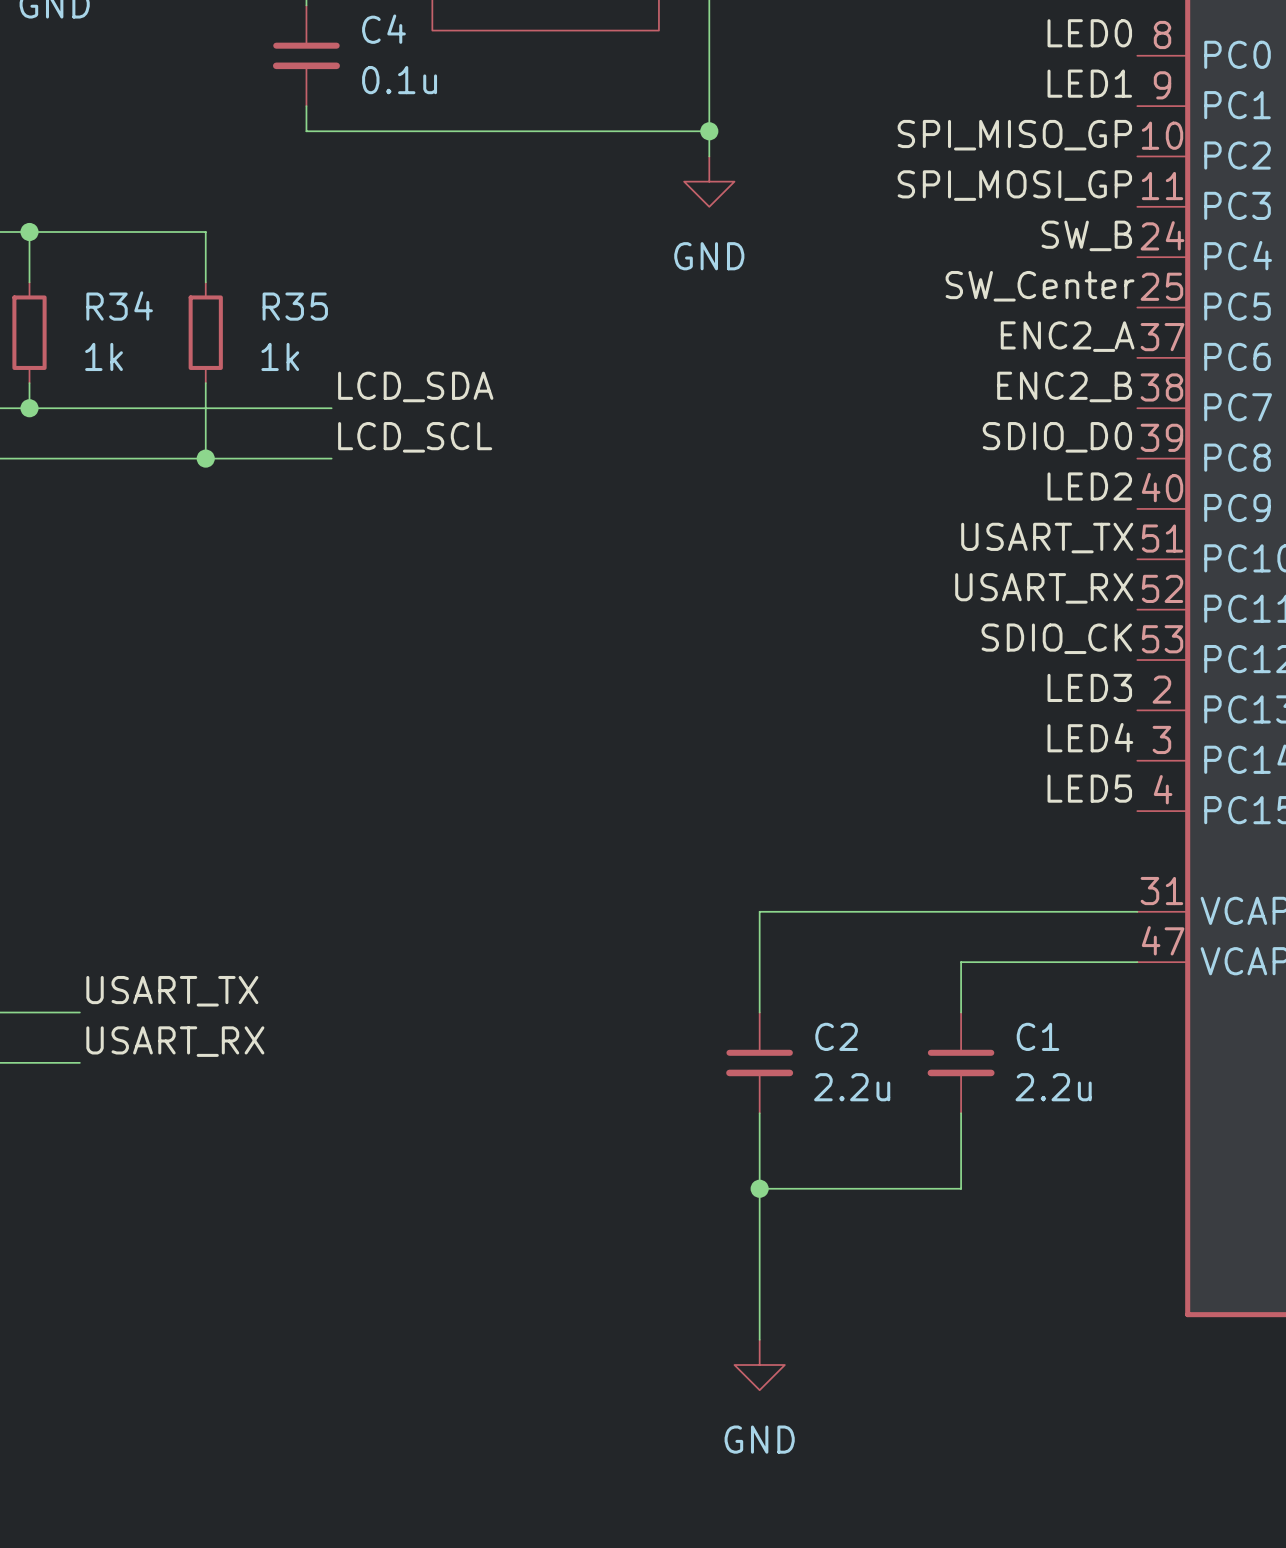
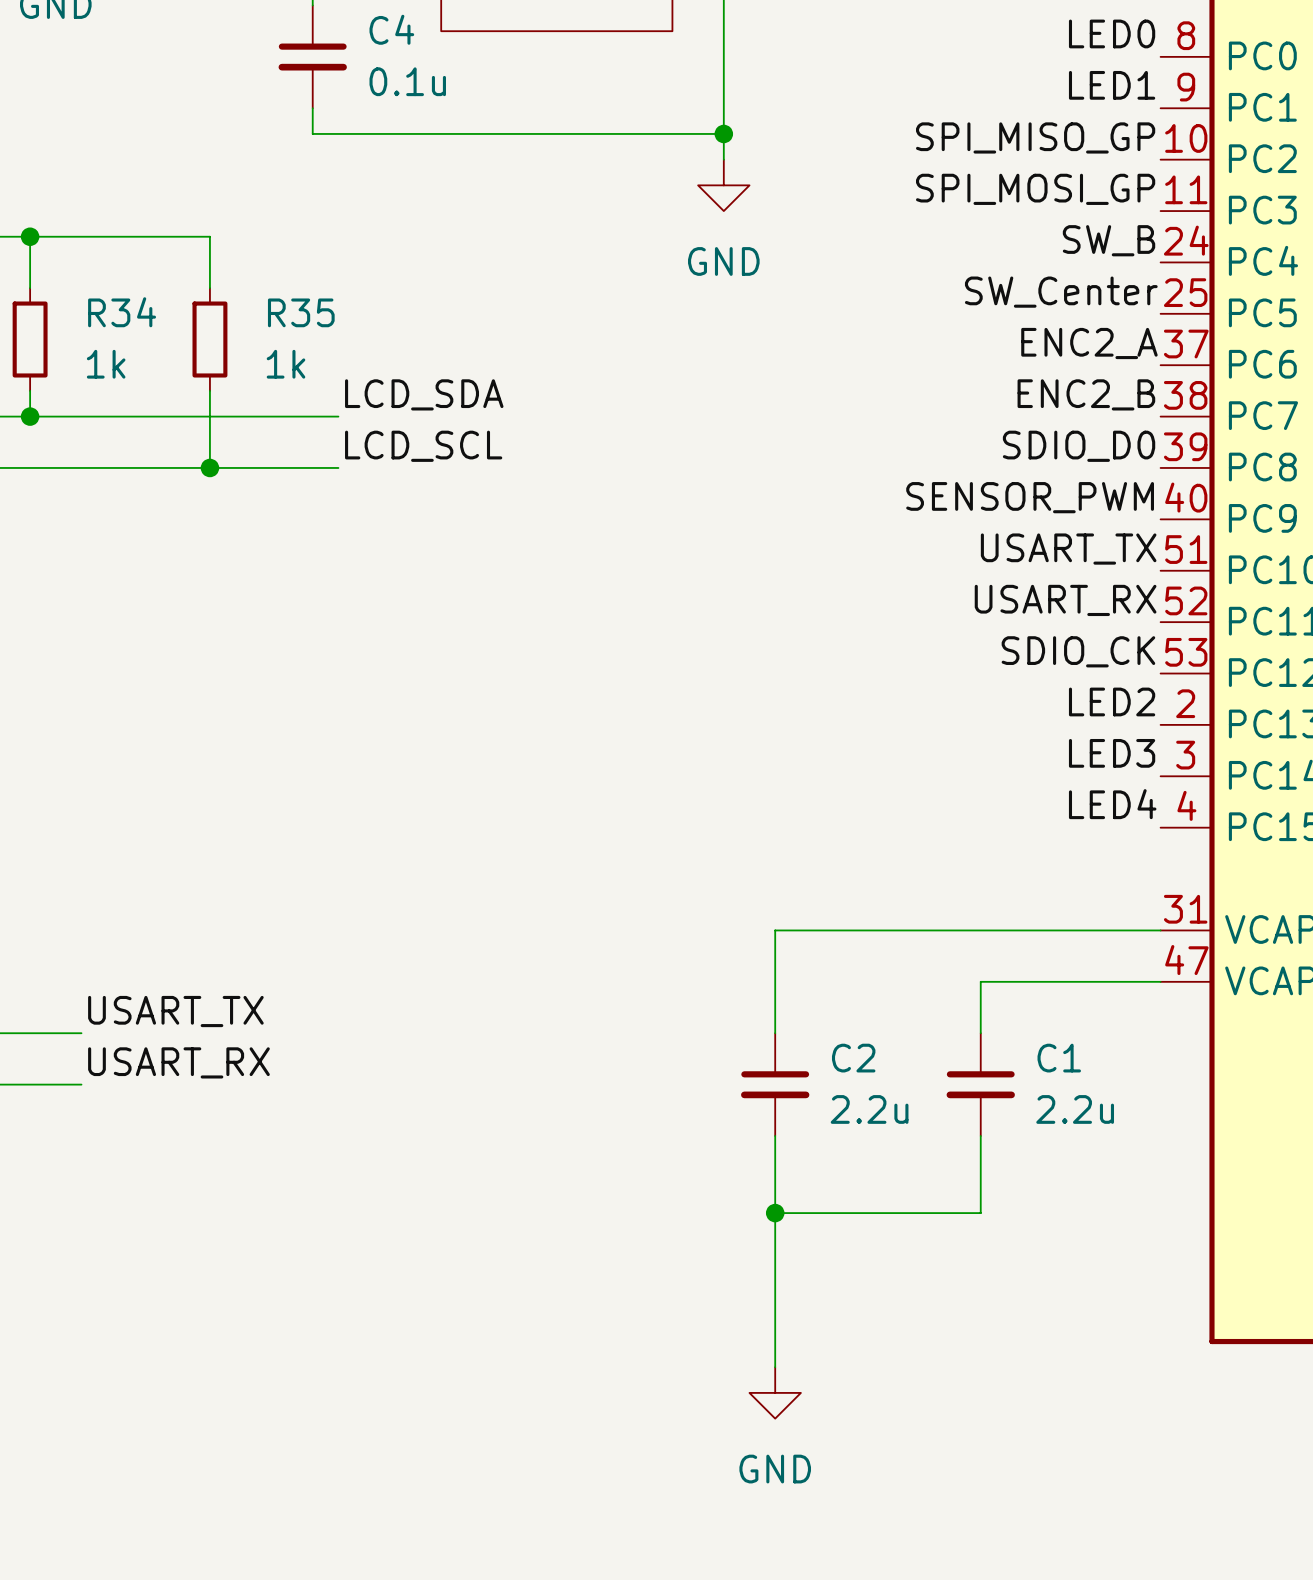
label: LED2 (1089, 486) -> SENSOR_PWM (1030, 497)
label: LED3 (1089, 687) -> LED2 (1112, 701)
label: LED4 (1090, 737) -> LED3 (1112, 753)
label: LED5 (1089, 788) -> LED4 (1112, 804)

